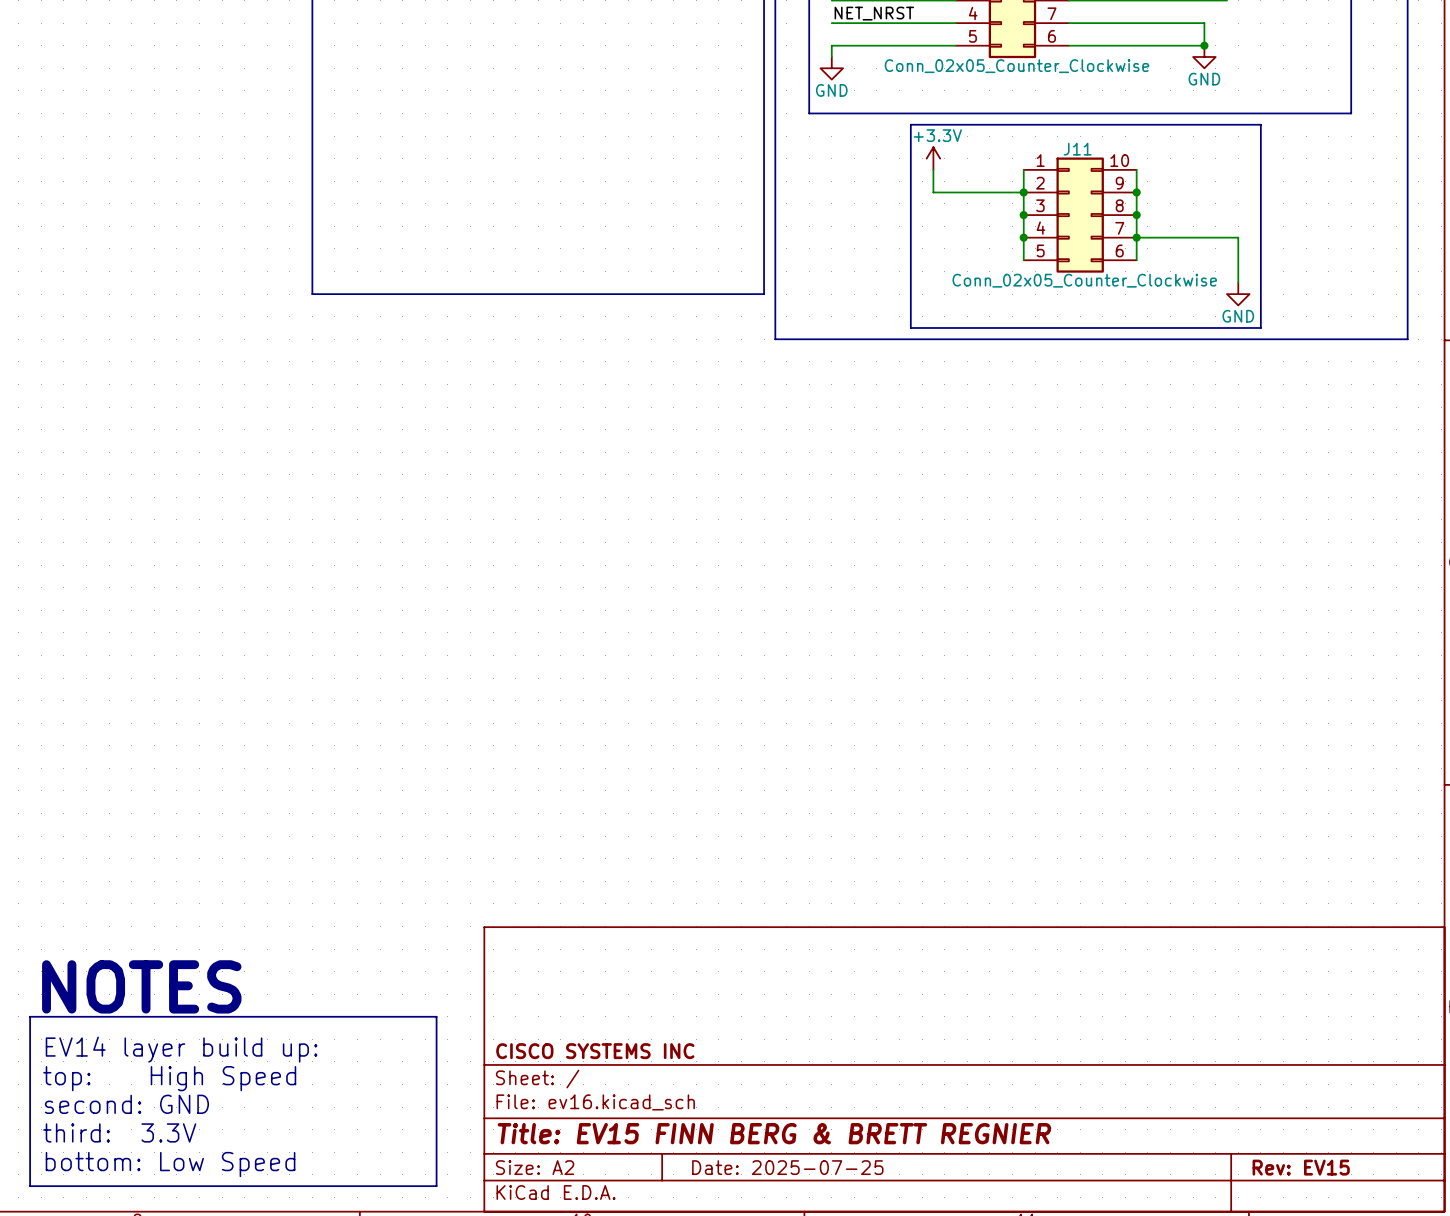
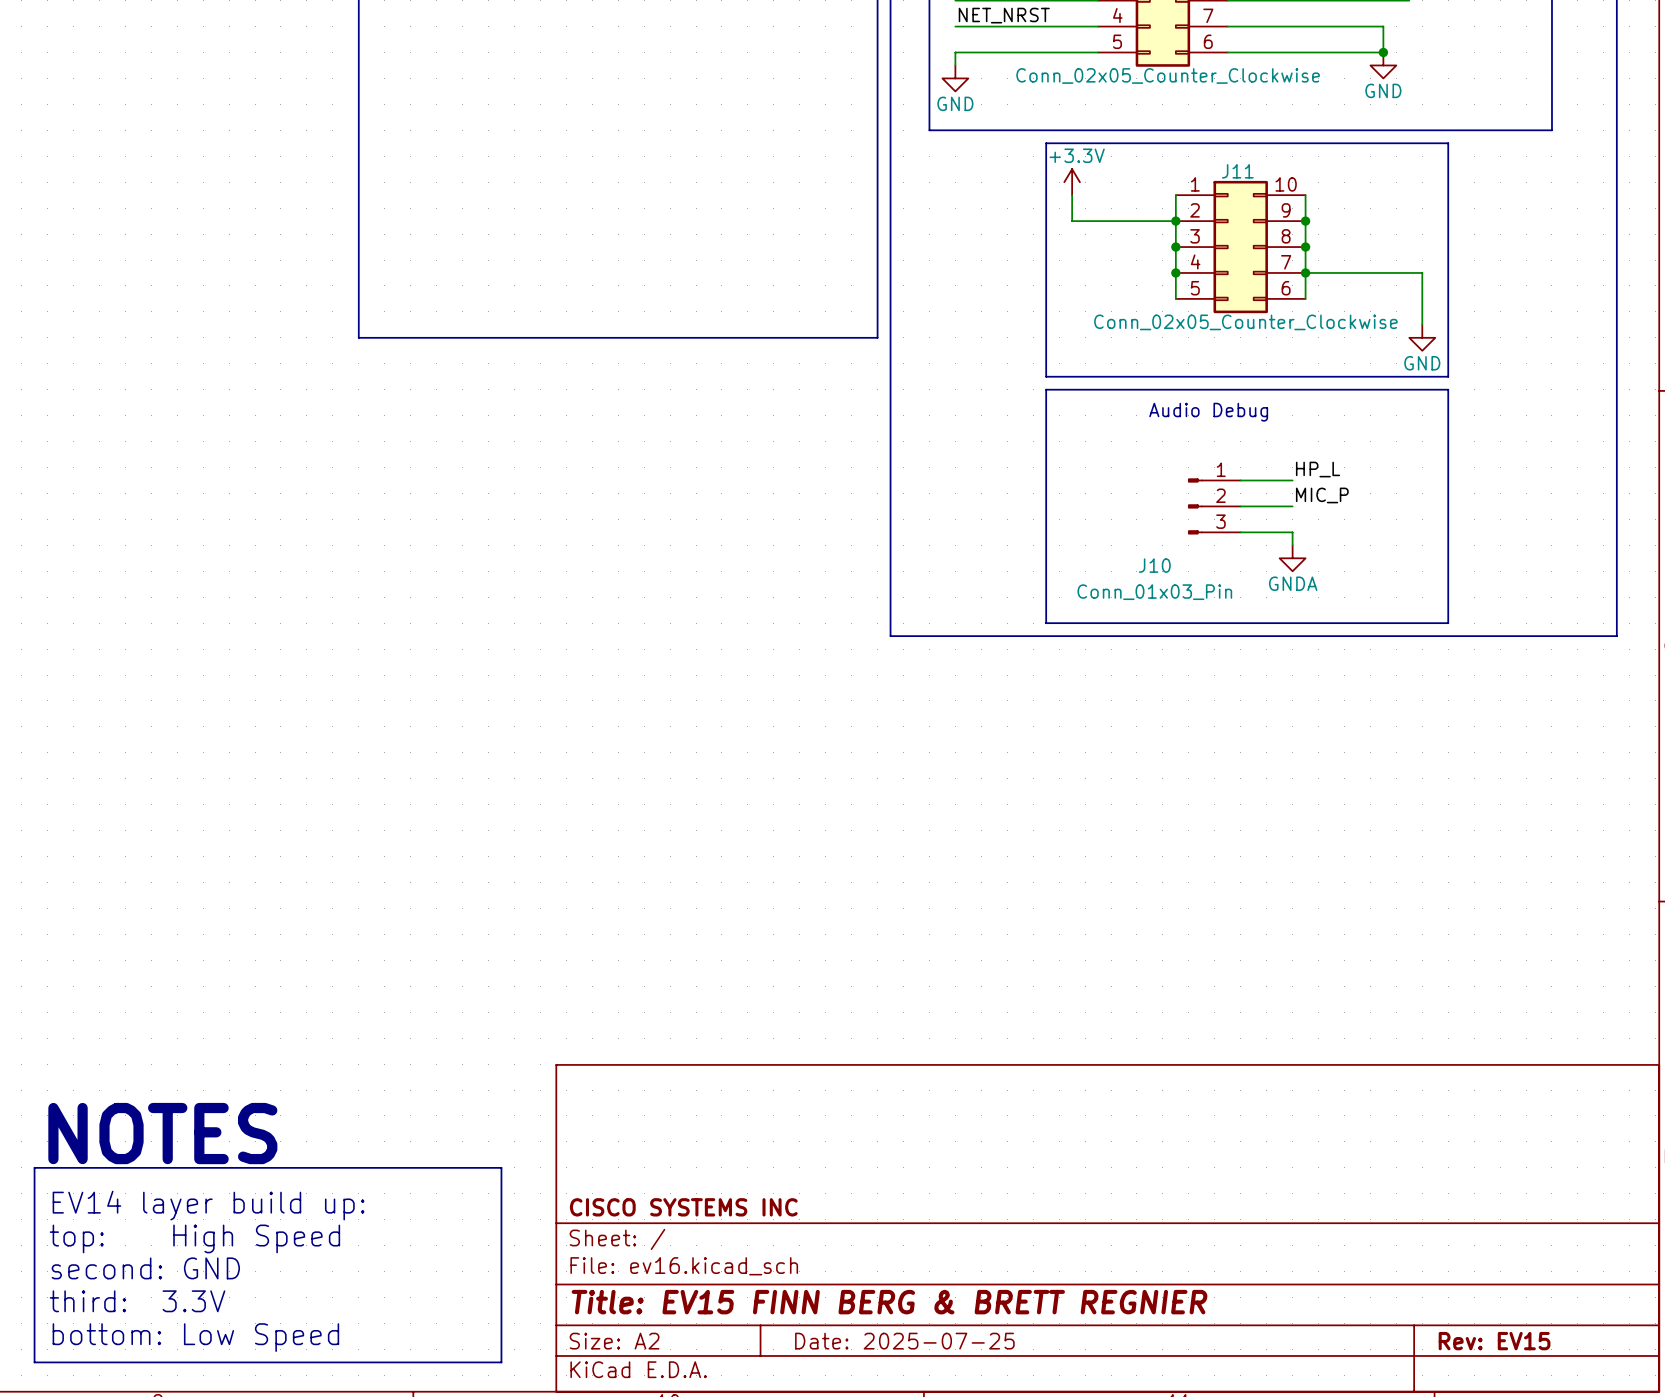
line: (775, 339) (910, 339) -> (1448, 389) (1448, 623) (1046, 623) (1046, 389)
line: (1260, 339) (1407, 339) -> (890, 389) (890, 636) (1616, 636) (1616, 389)
text: none -> Audio Debug (1208, 412)
label: none -> HP_L (1318, 469)
wire: none -> (1240, 480) (1292, 480)
label: none -> MIC_P (1322, 495)
J10: none -> Conn_01x03_Pin (1214, 506)
wire: none -> (1240, 506) (1292, 506)
wire: none -> (1240, 532) (1292, 532) (1292, 545)
power symbol: none -> GNDA (1292, 558)

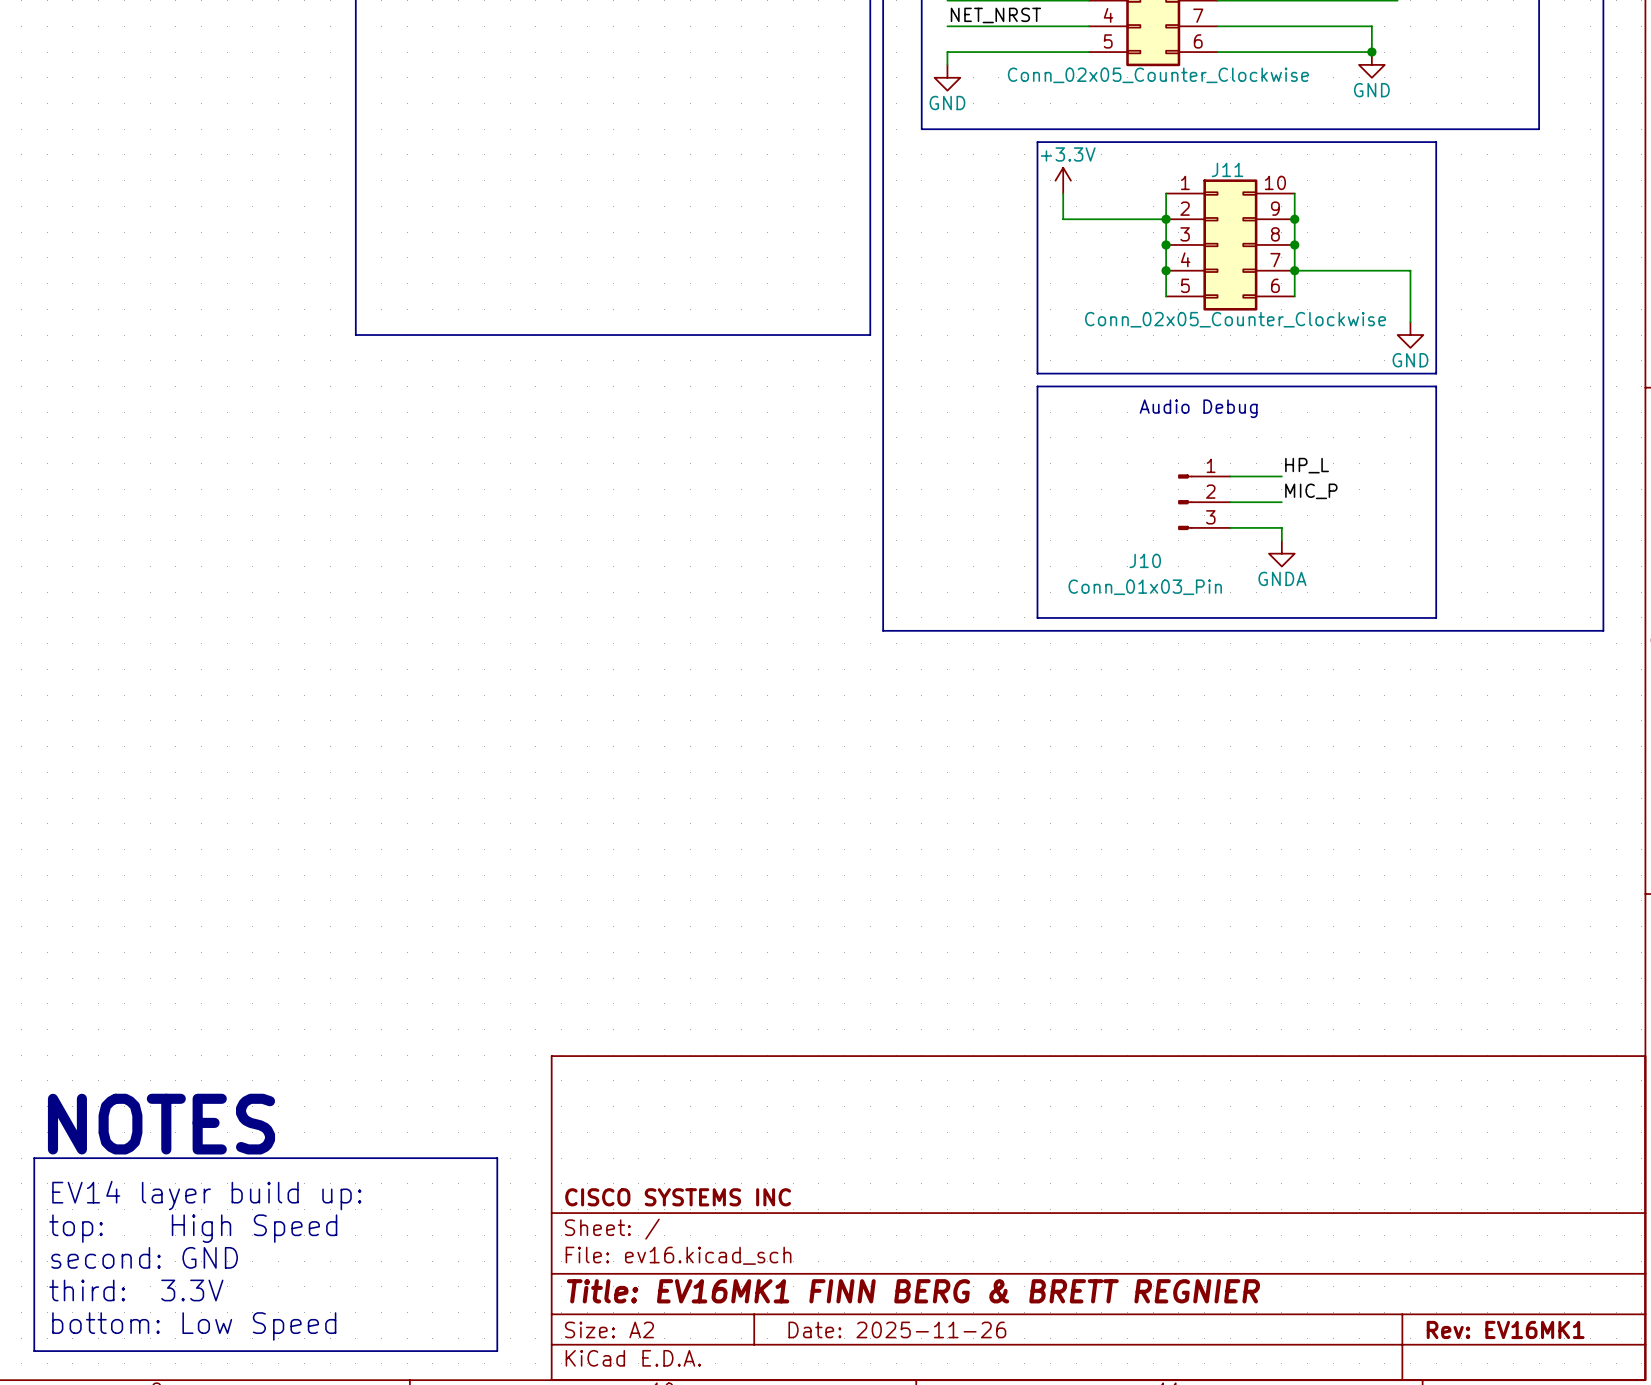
title block: Title: EV15 FINN BERG & BRETT REGNIER (889, 1302) -> Title: EV16MK1 FINN BERG & BRETT REGNIER (913, 1291)
title block: Date: 2025-07-25 (904, 1341) -> Date: 2025-11-26 (897, 1329)
title block: Rev: EV15 (1494, 1341) -> Rev: EV16MK1 (1505, 1329)

